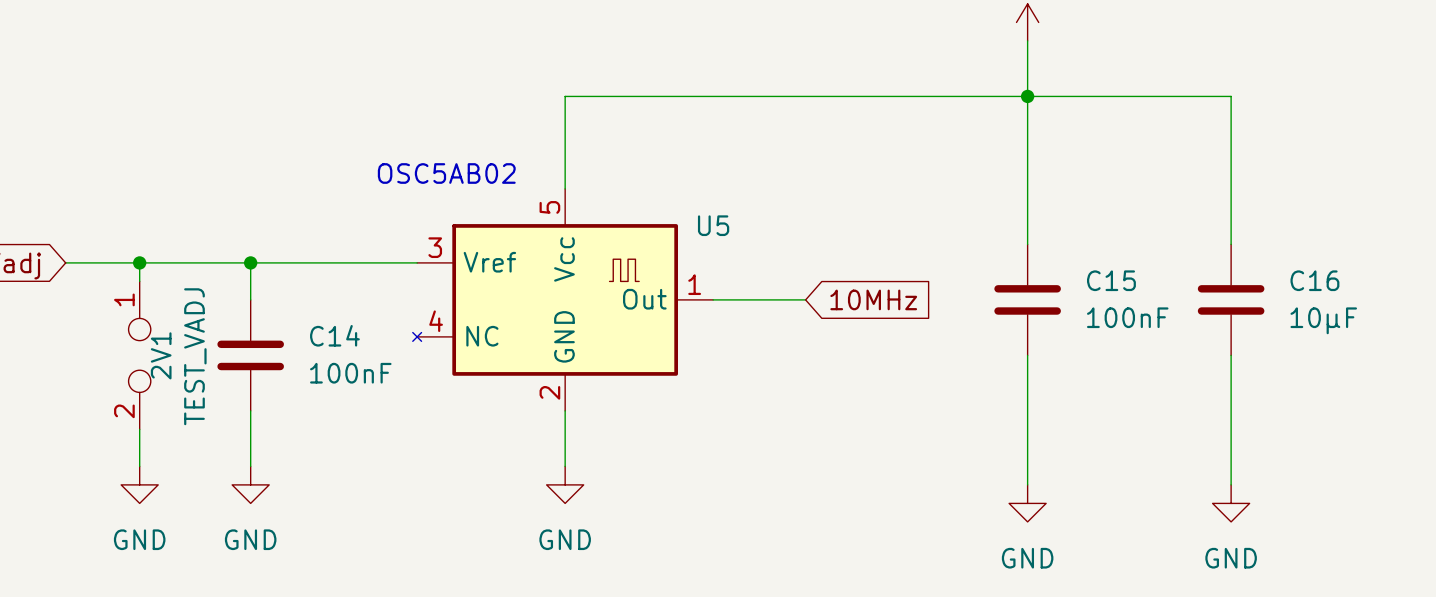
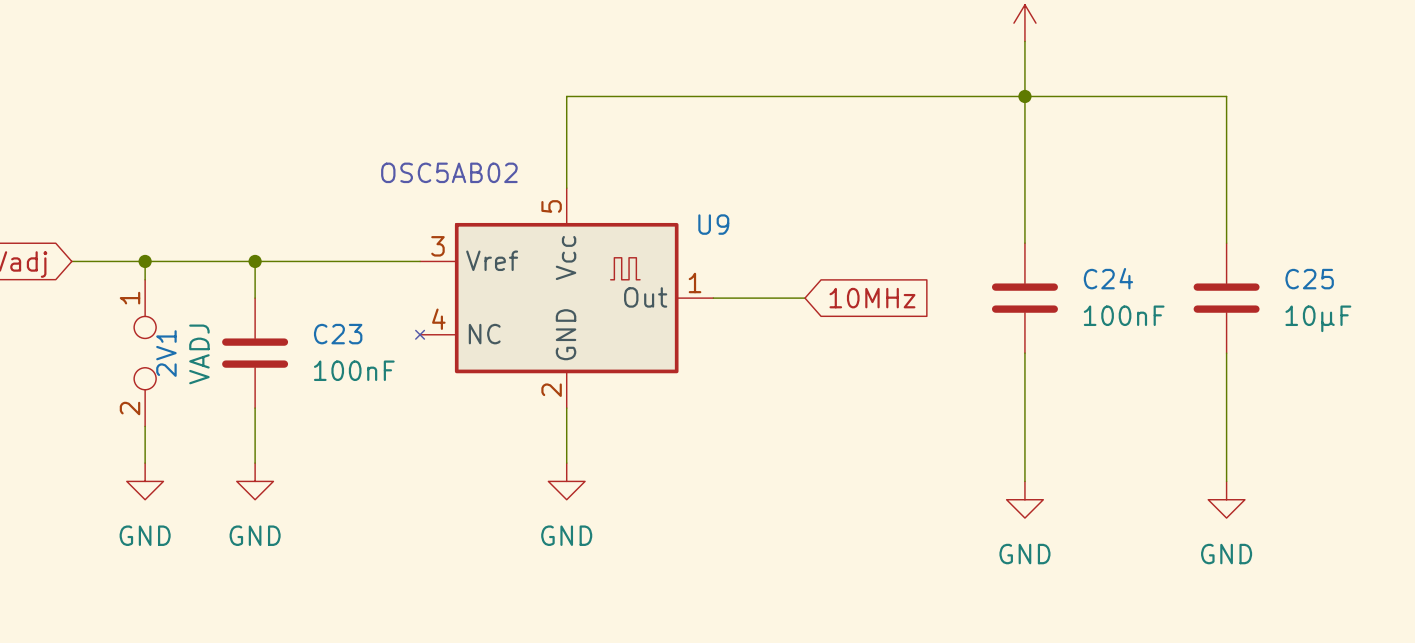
U5 name: U5 (713, 225) -> U9 (713, 224)
C15 name: C15 (1111, 280) -> C24 (1108, 278)
C16 name: C16 (1314, 280) -> C25 (1309, 279)
C14 name: C14 (334, 335) -> C23 (338, 334)
2V1 value: TEST_VADJ (195, 356) -> VADJ (199, 354)

